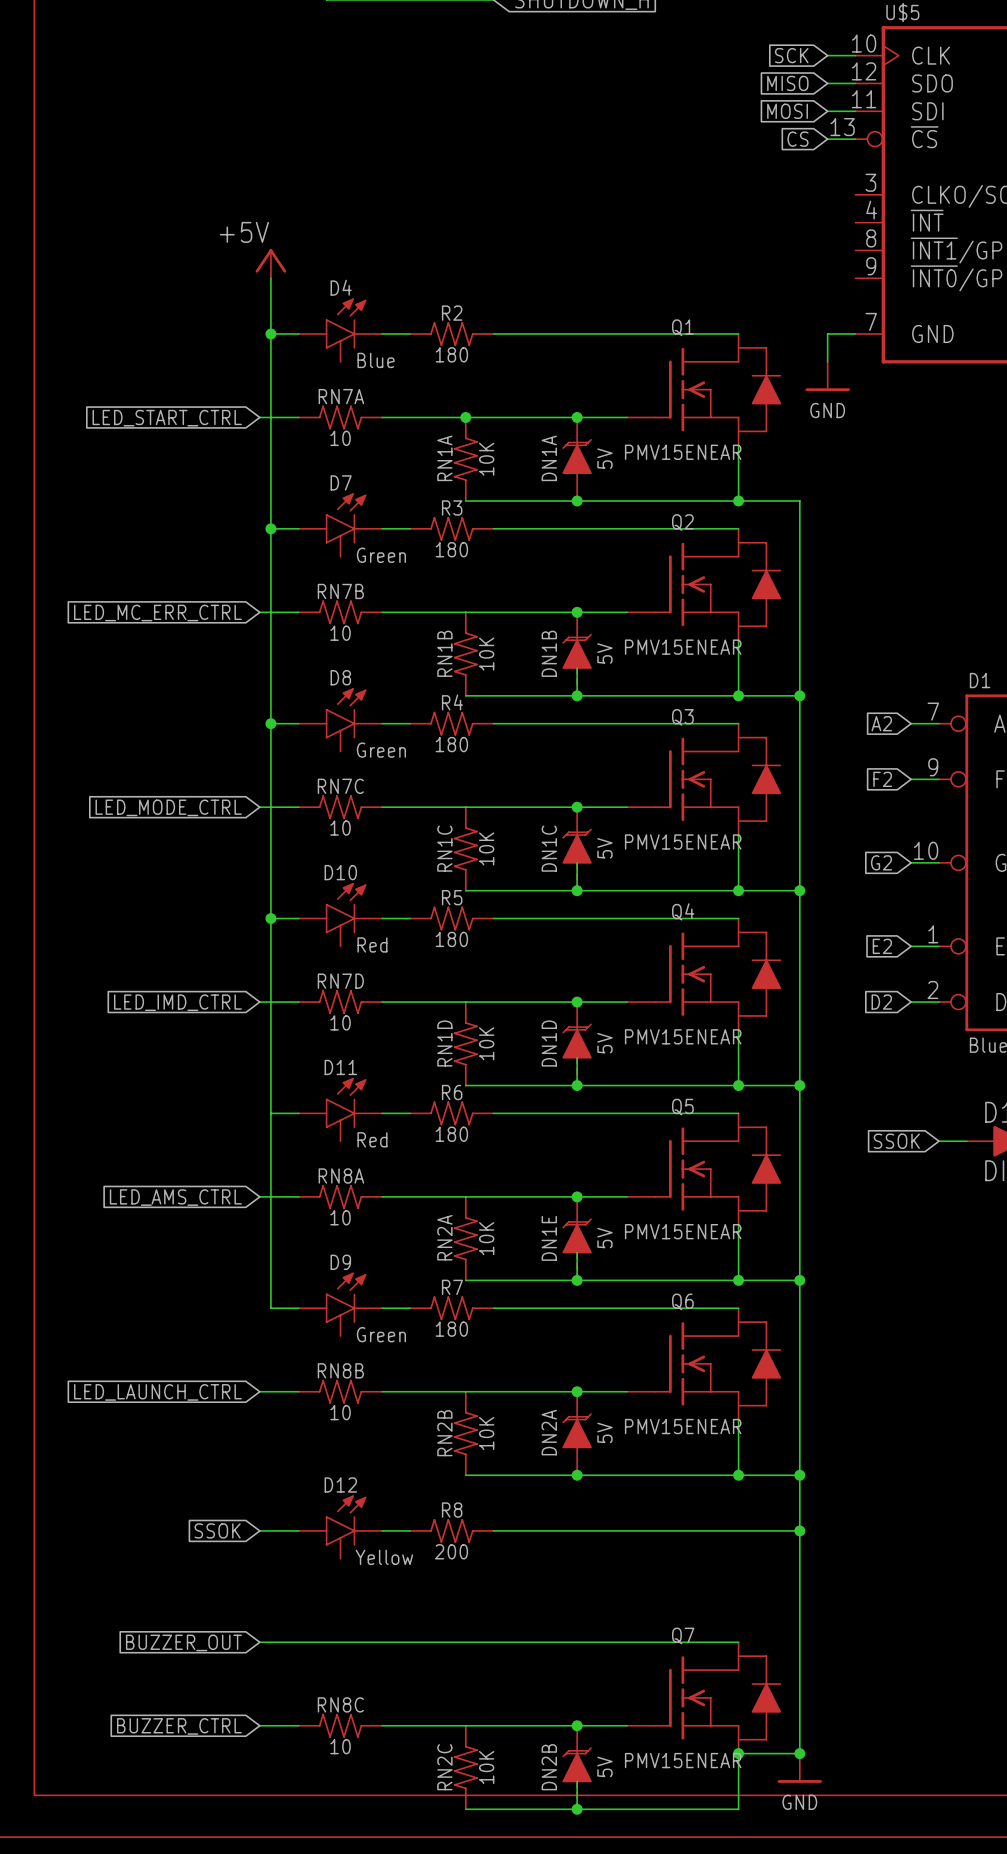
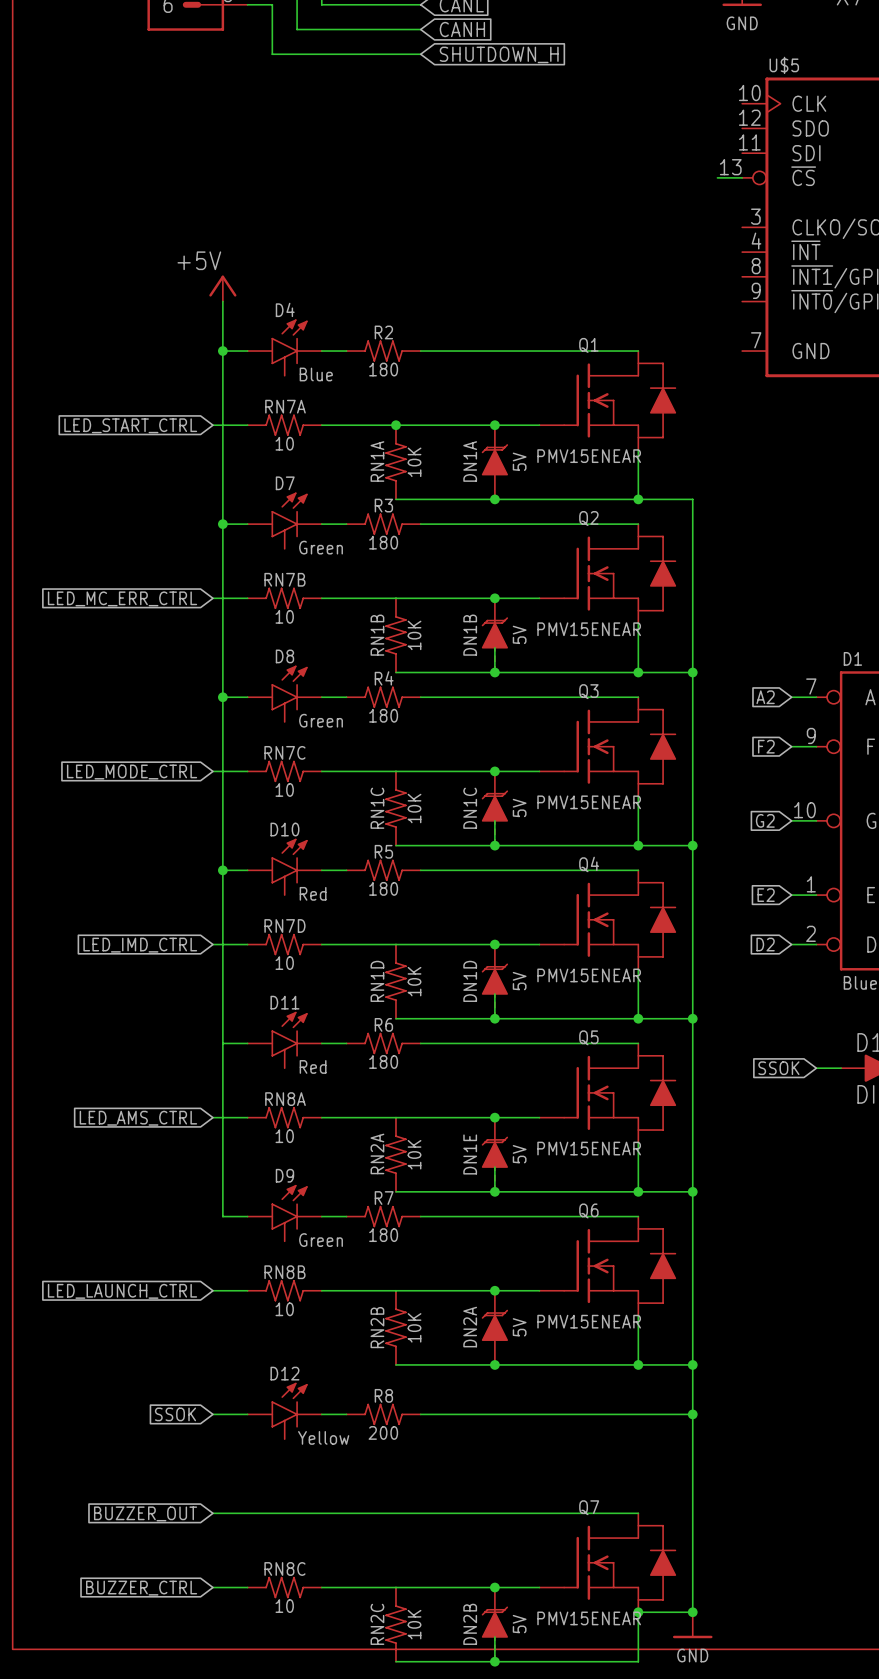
global label: SCK (791, 55) -> none
wire: (827, 55) (855, 55) -> none
global label: MISO (787, 83) -> none
wire: (827, 83) (855, 83) -> none
global label: MOSI (787, 111) -> none
wire: (827, 111) (855, 111) -> none
global label: CS (797, 139) -> none
wire: (855, 333) (827, 333) (827, 361) -> none
power symbol: GND (827, 376) -> none

